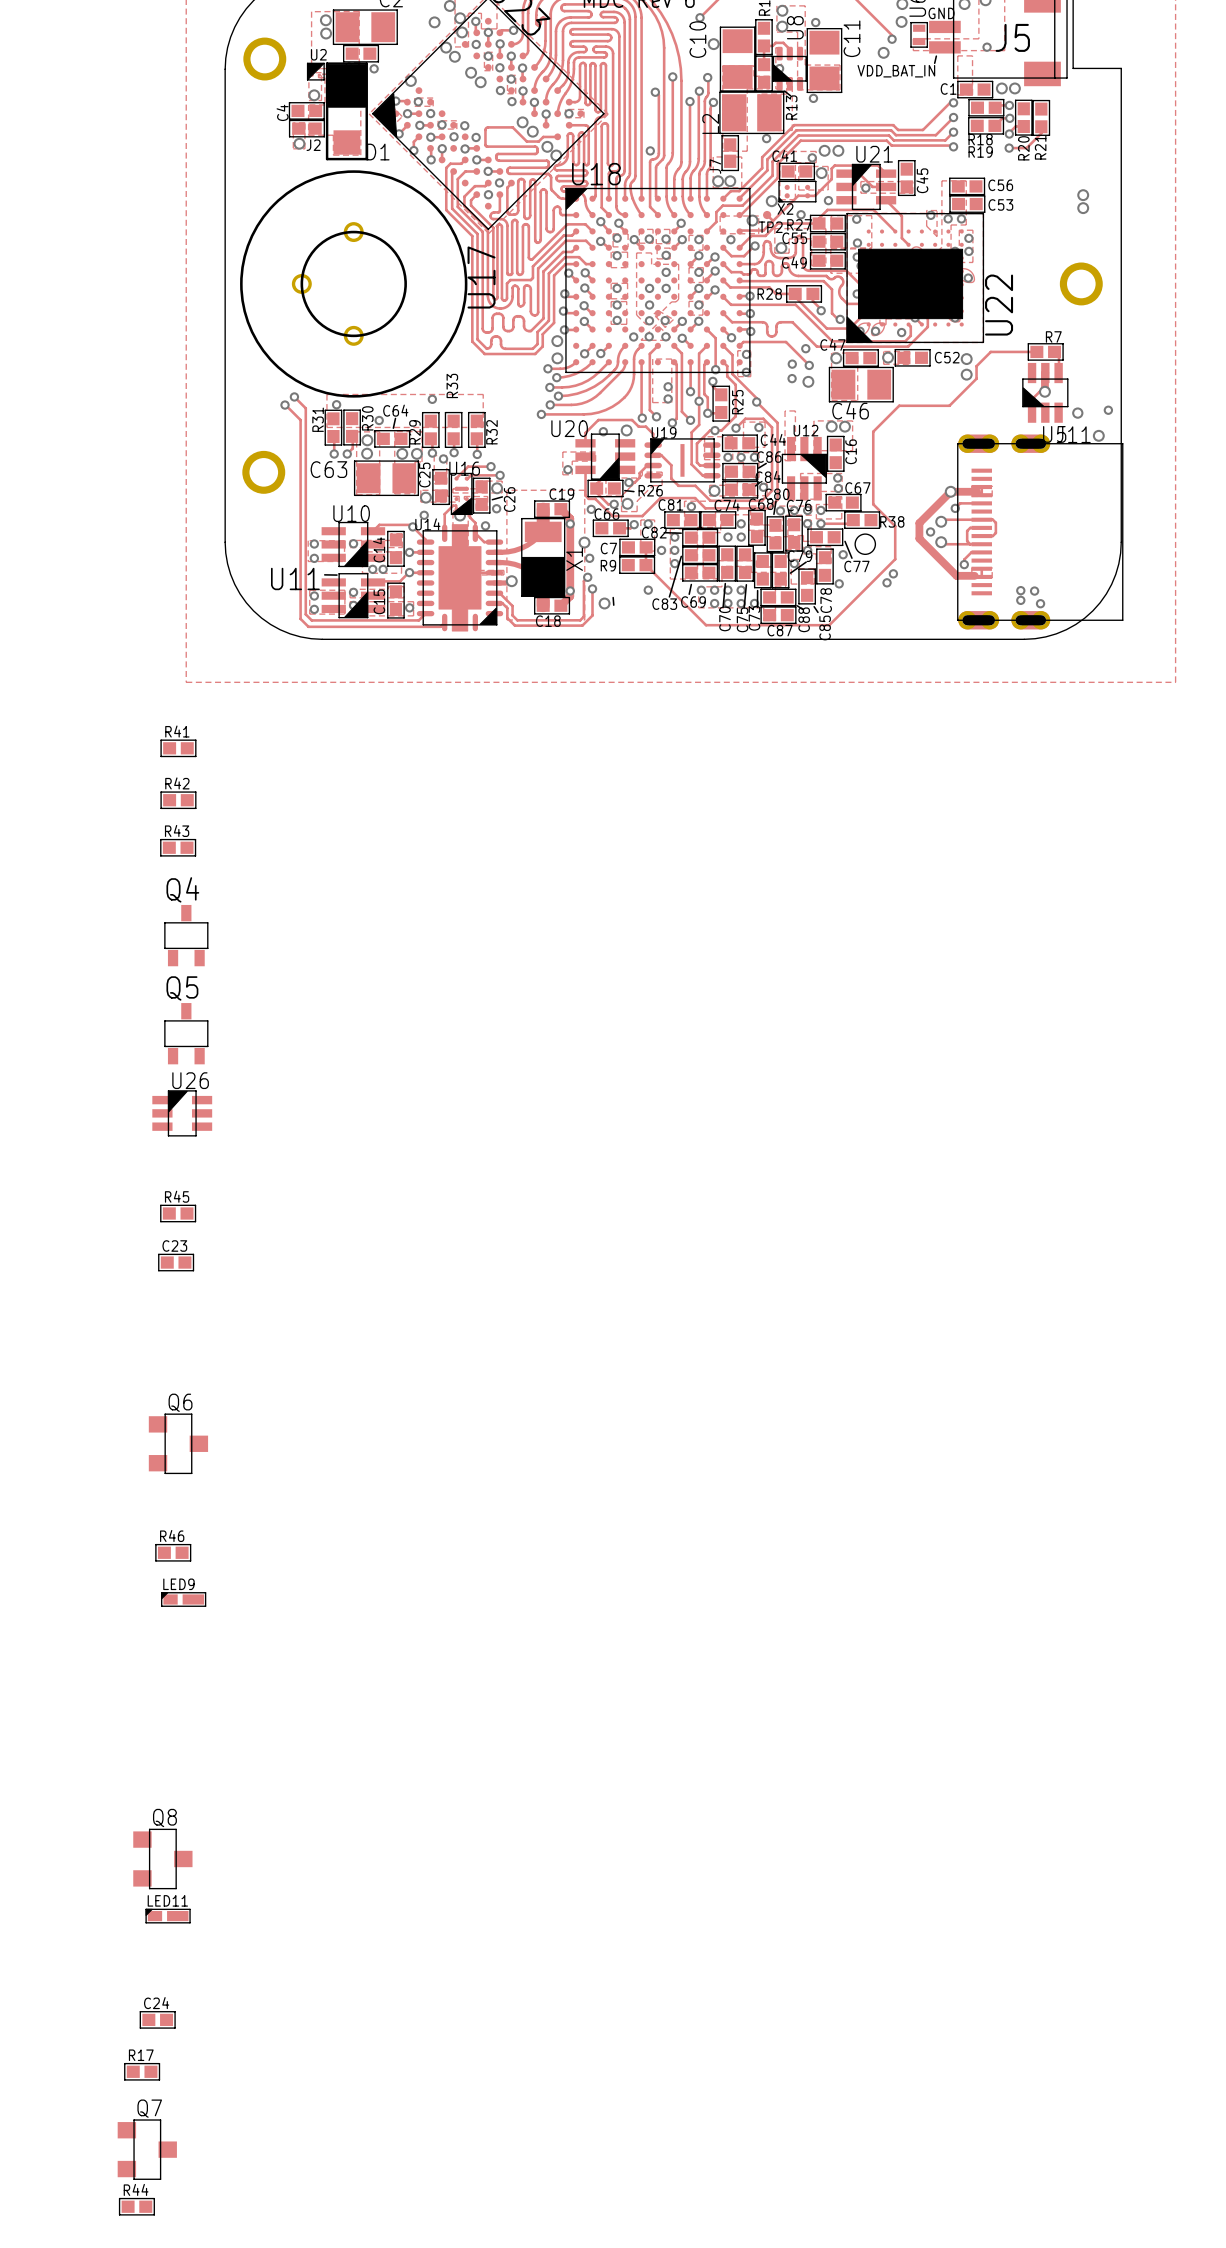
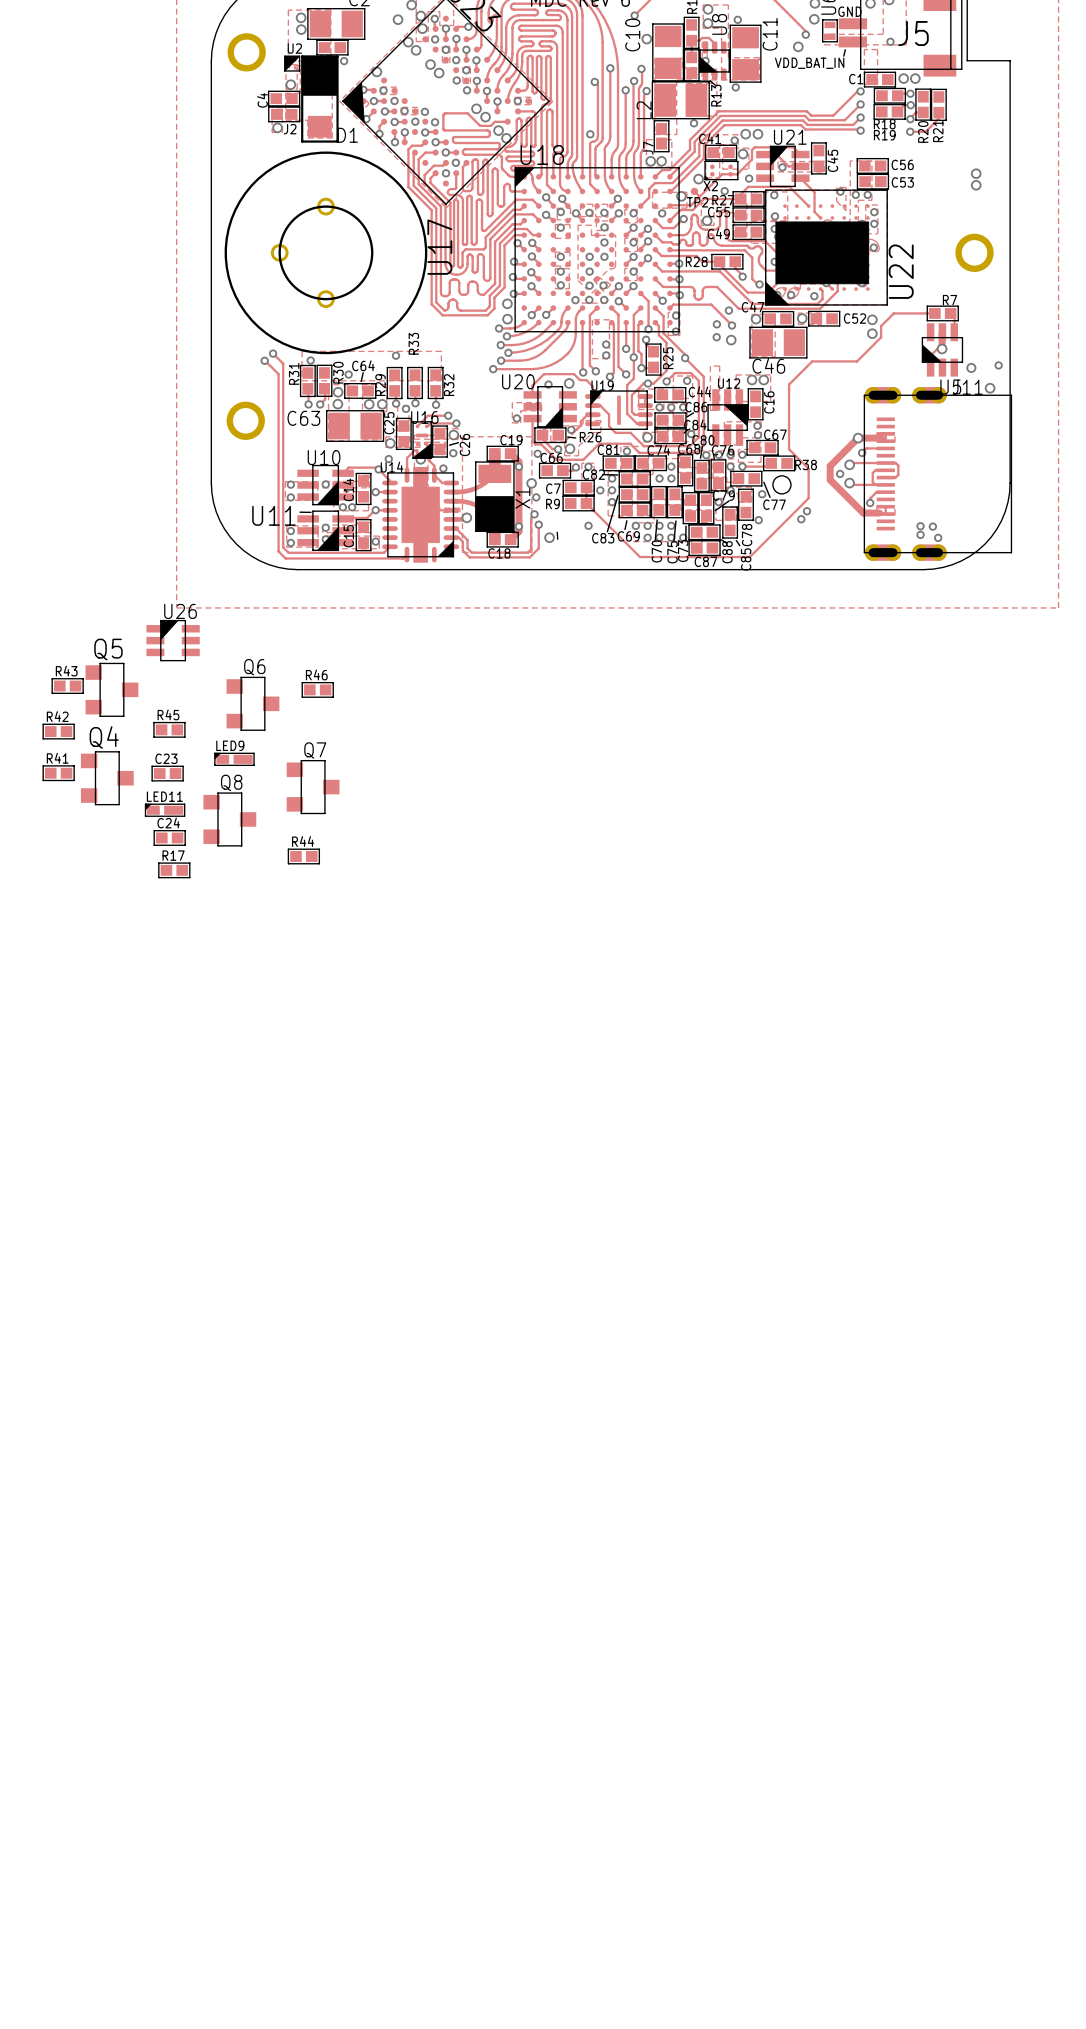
R41 position: (178, 748) -> (58, 773)
R42 position: (178, 800) -> (58, 731)
R43 position: (178, 847) -> (67, 686)
Q4 footprint: [164, 904, 209, 967] -> [80, 751, 134, 806]
Q5 footprint: [164, 1003, 209, 1065] -> [85, 662, 139, 717]
U26 position: (182, 1113) -> (173, 640)
R45 position: (178, 1213) -> (169, 729)
C23 position: (176, 1262) -> (167, 773)
Q6 position: (178, 1443) -> (252, 703)
R46 position: (173, 1552) -> (317, 689)
LED9 position: (183, 1599) -> (234, 759)
Q8 position: (162, 1858) -> (229, 819)
LED11 position: (168, 1916) -> (165, 810)
C24 position: (157, 2019) -> (169, 837)
R17 position: (142, 2071) -> (174, 870)
Q7 position: (147, 2149) -> (313, 787)
R44 position: (136, 2206) -> (303, 856)

